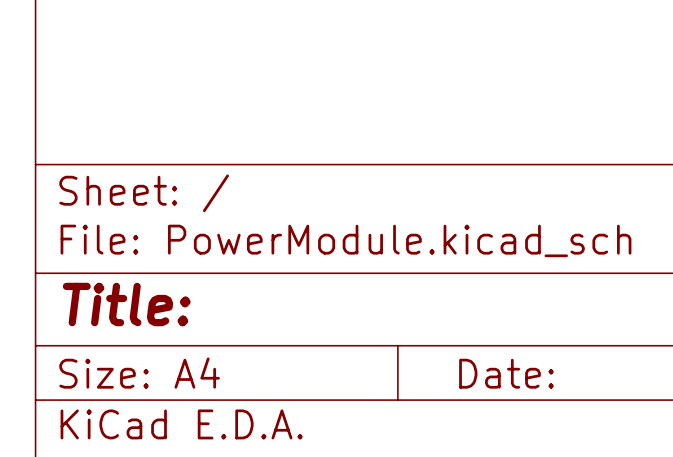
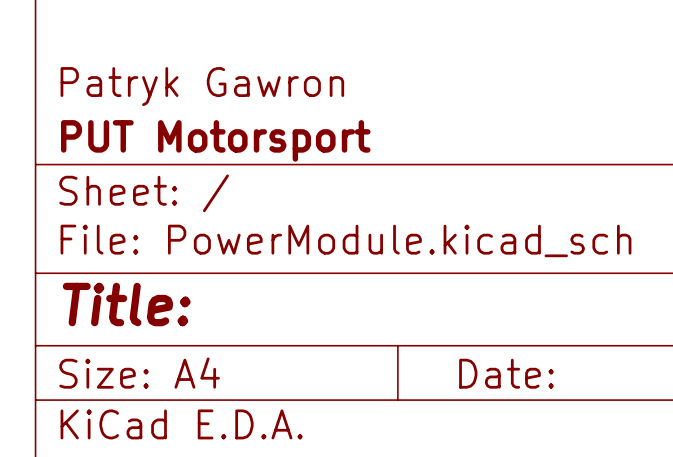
title block: none -> Patryk Gawron (202, 86)
title block: none -> PUT Motorsport (215, 140)

